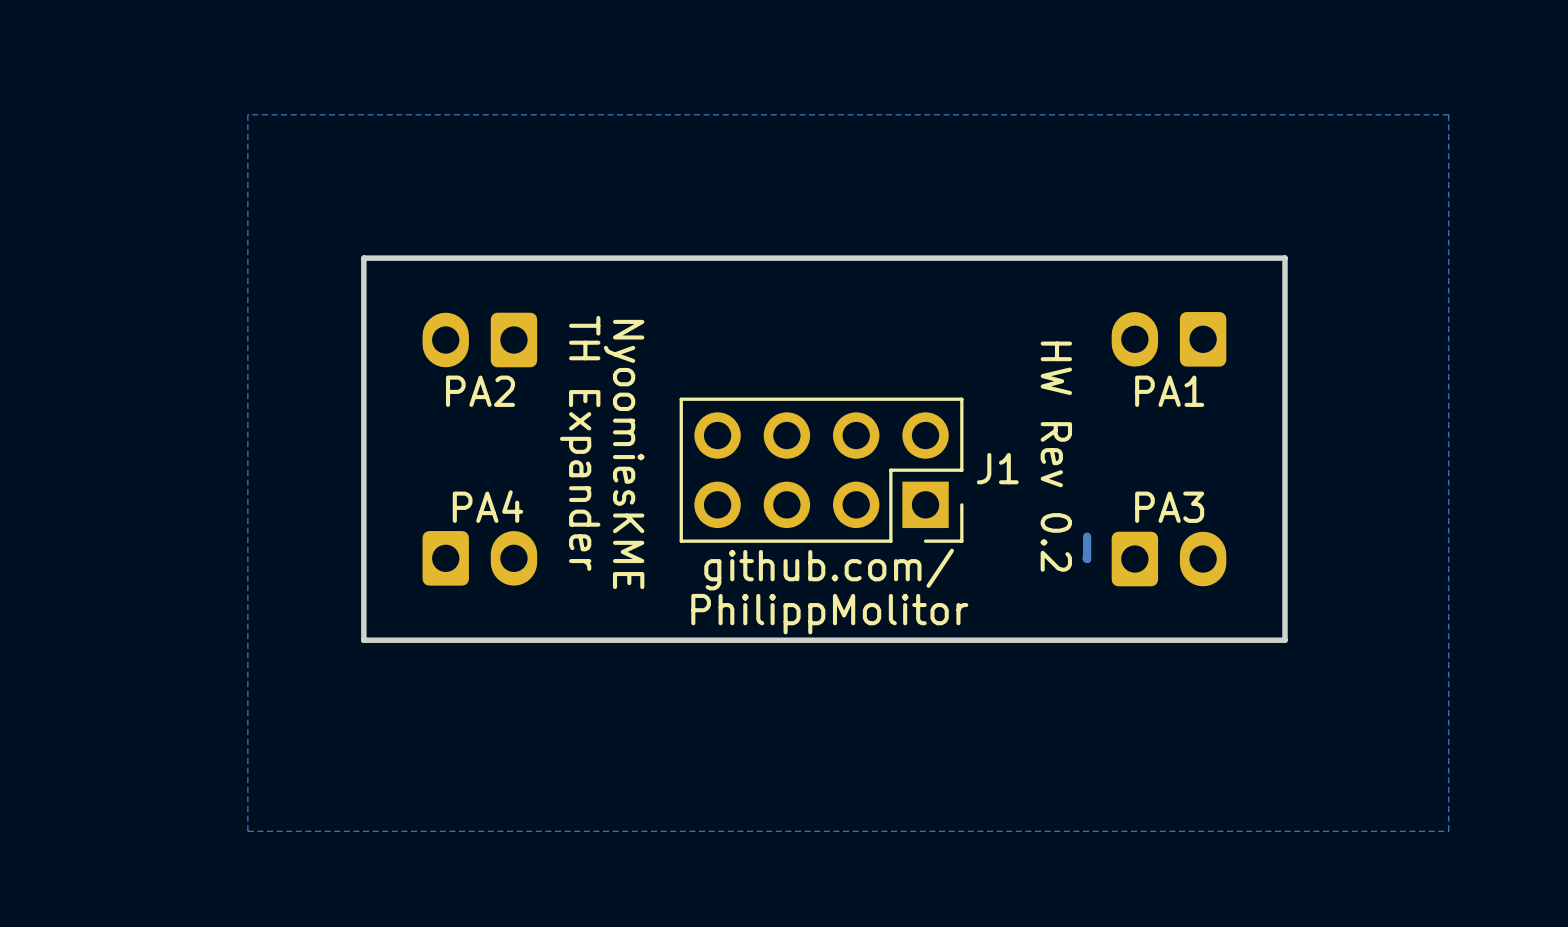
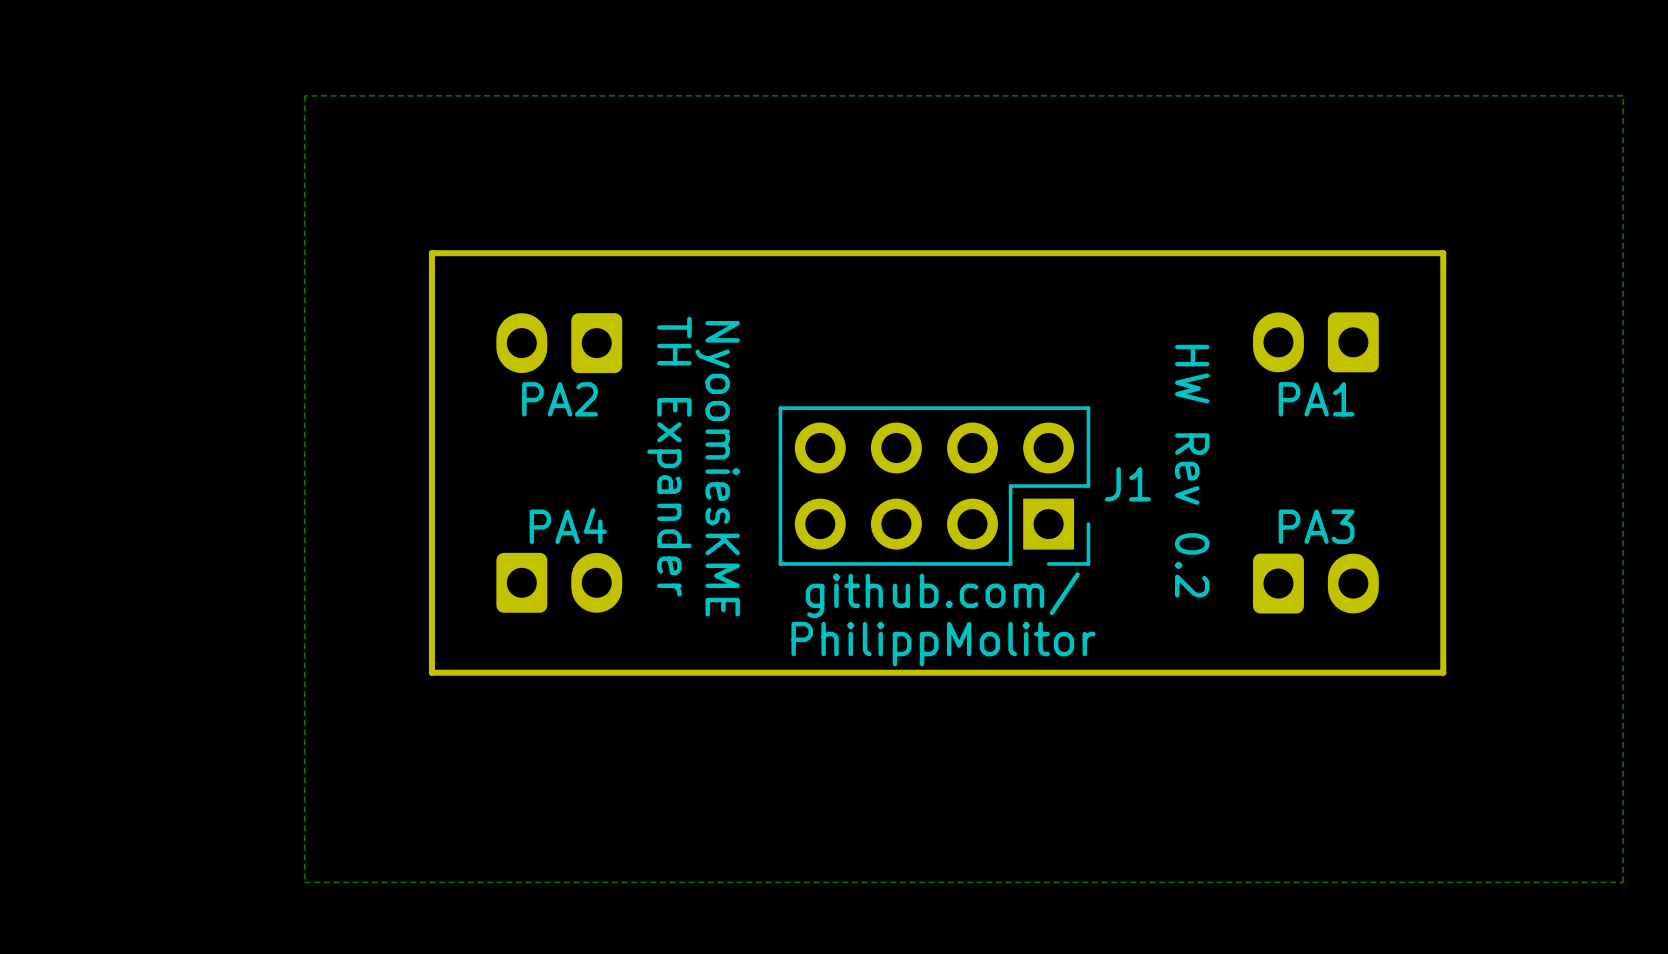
track: (1087, 536) (1086, 558) -> none

